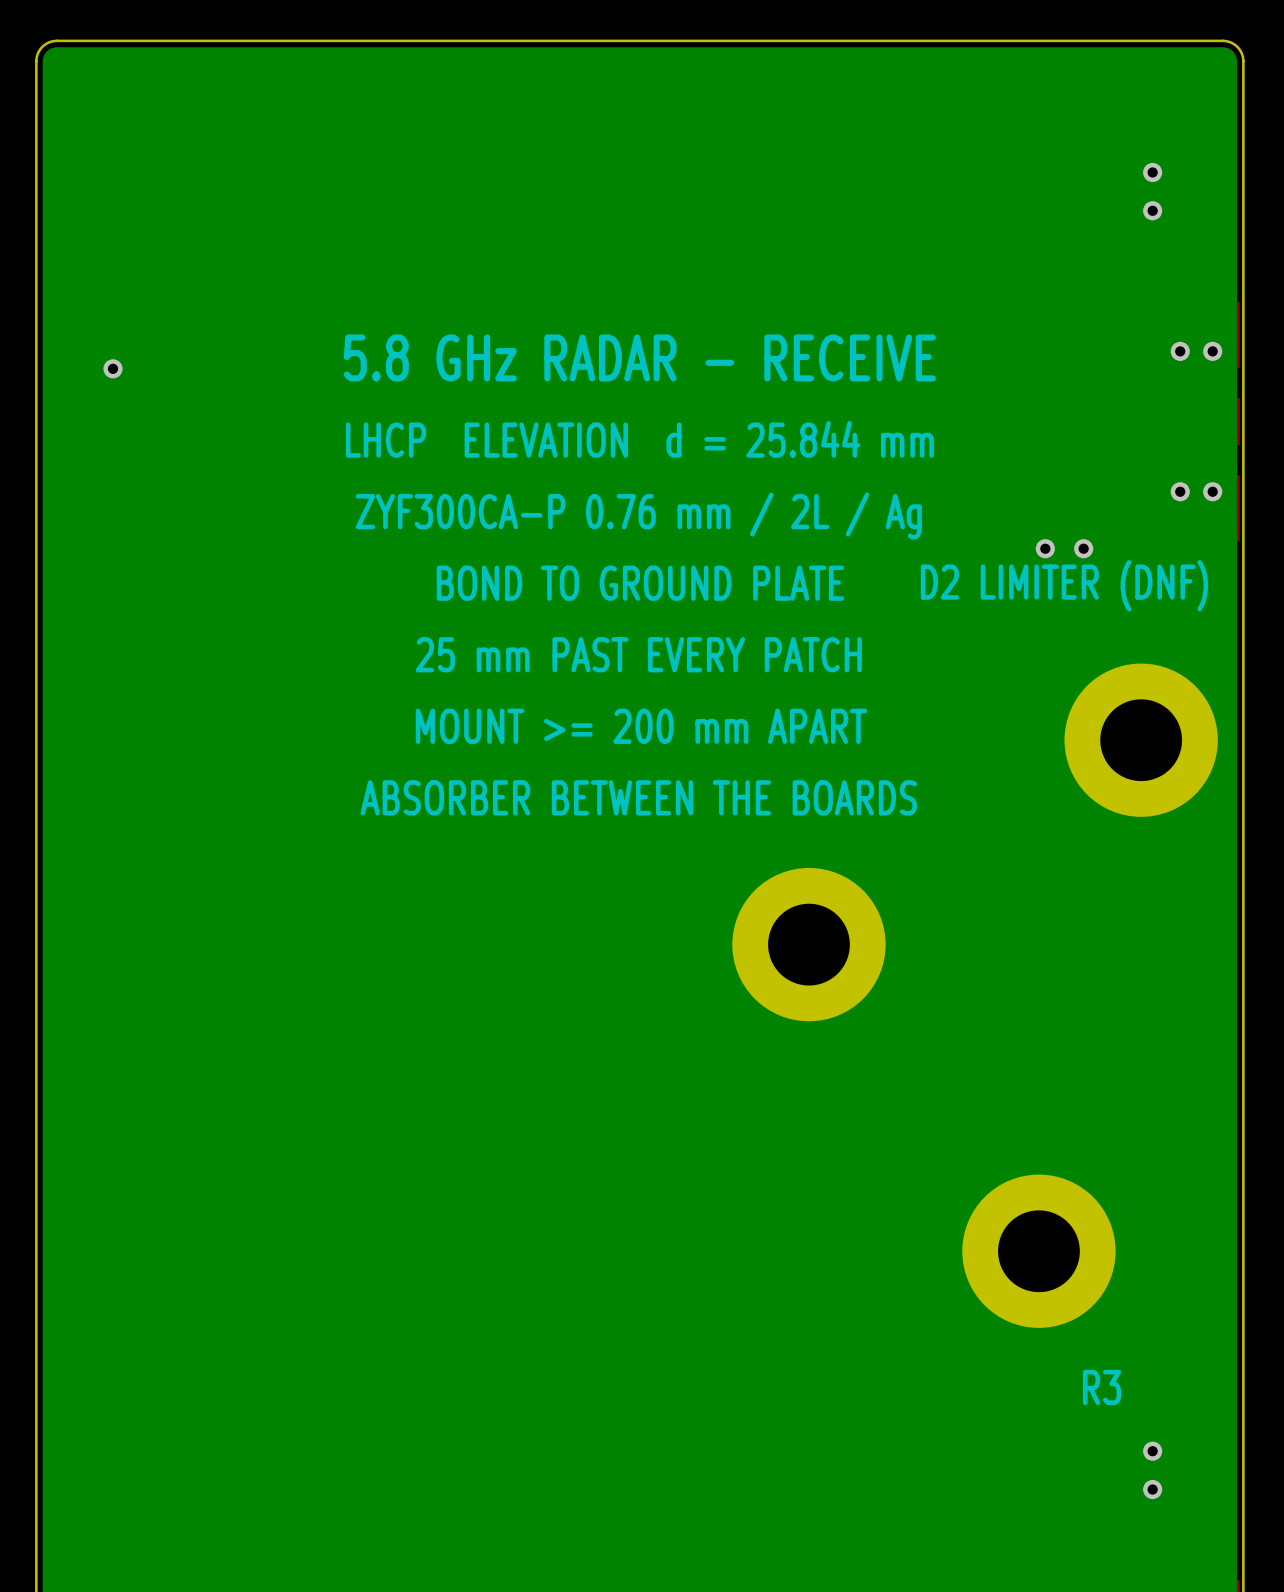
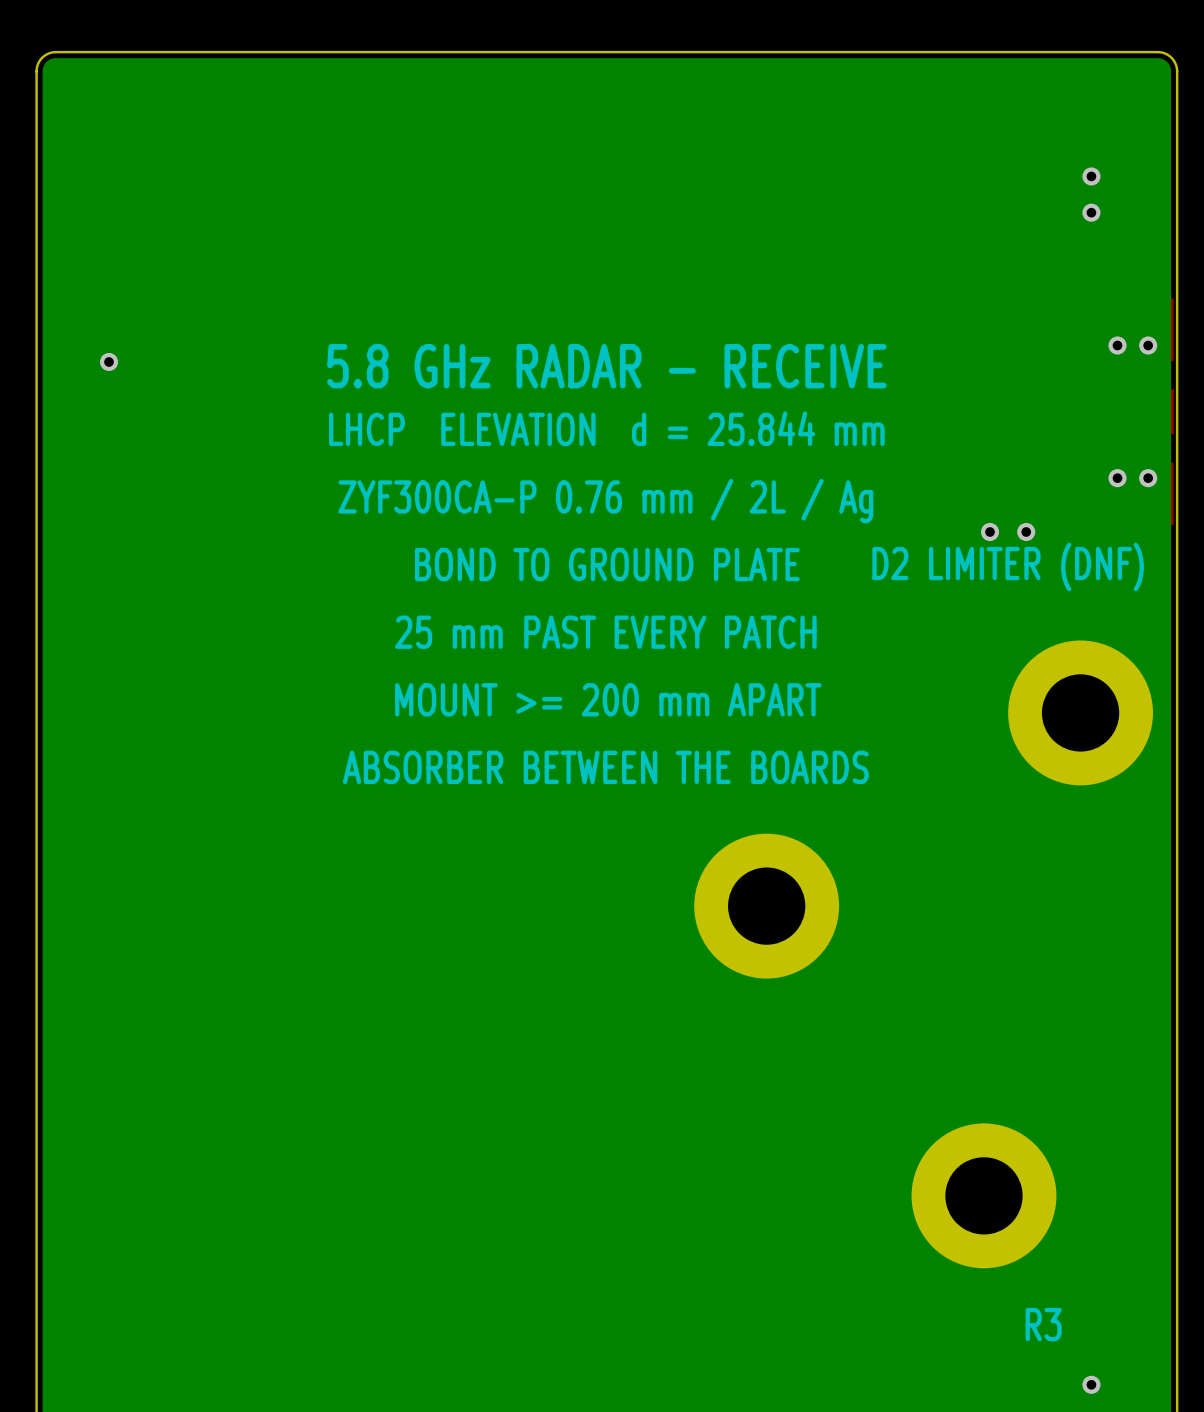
text position: 5.8 GHz RADAR - RECEIVE (639, 357) -> 5.8 GHz RADAR - RECEIVE (606, 366)

